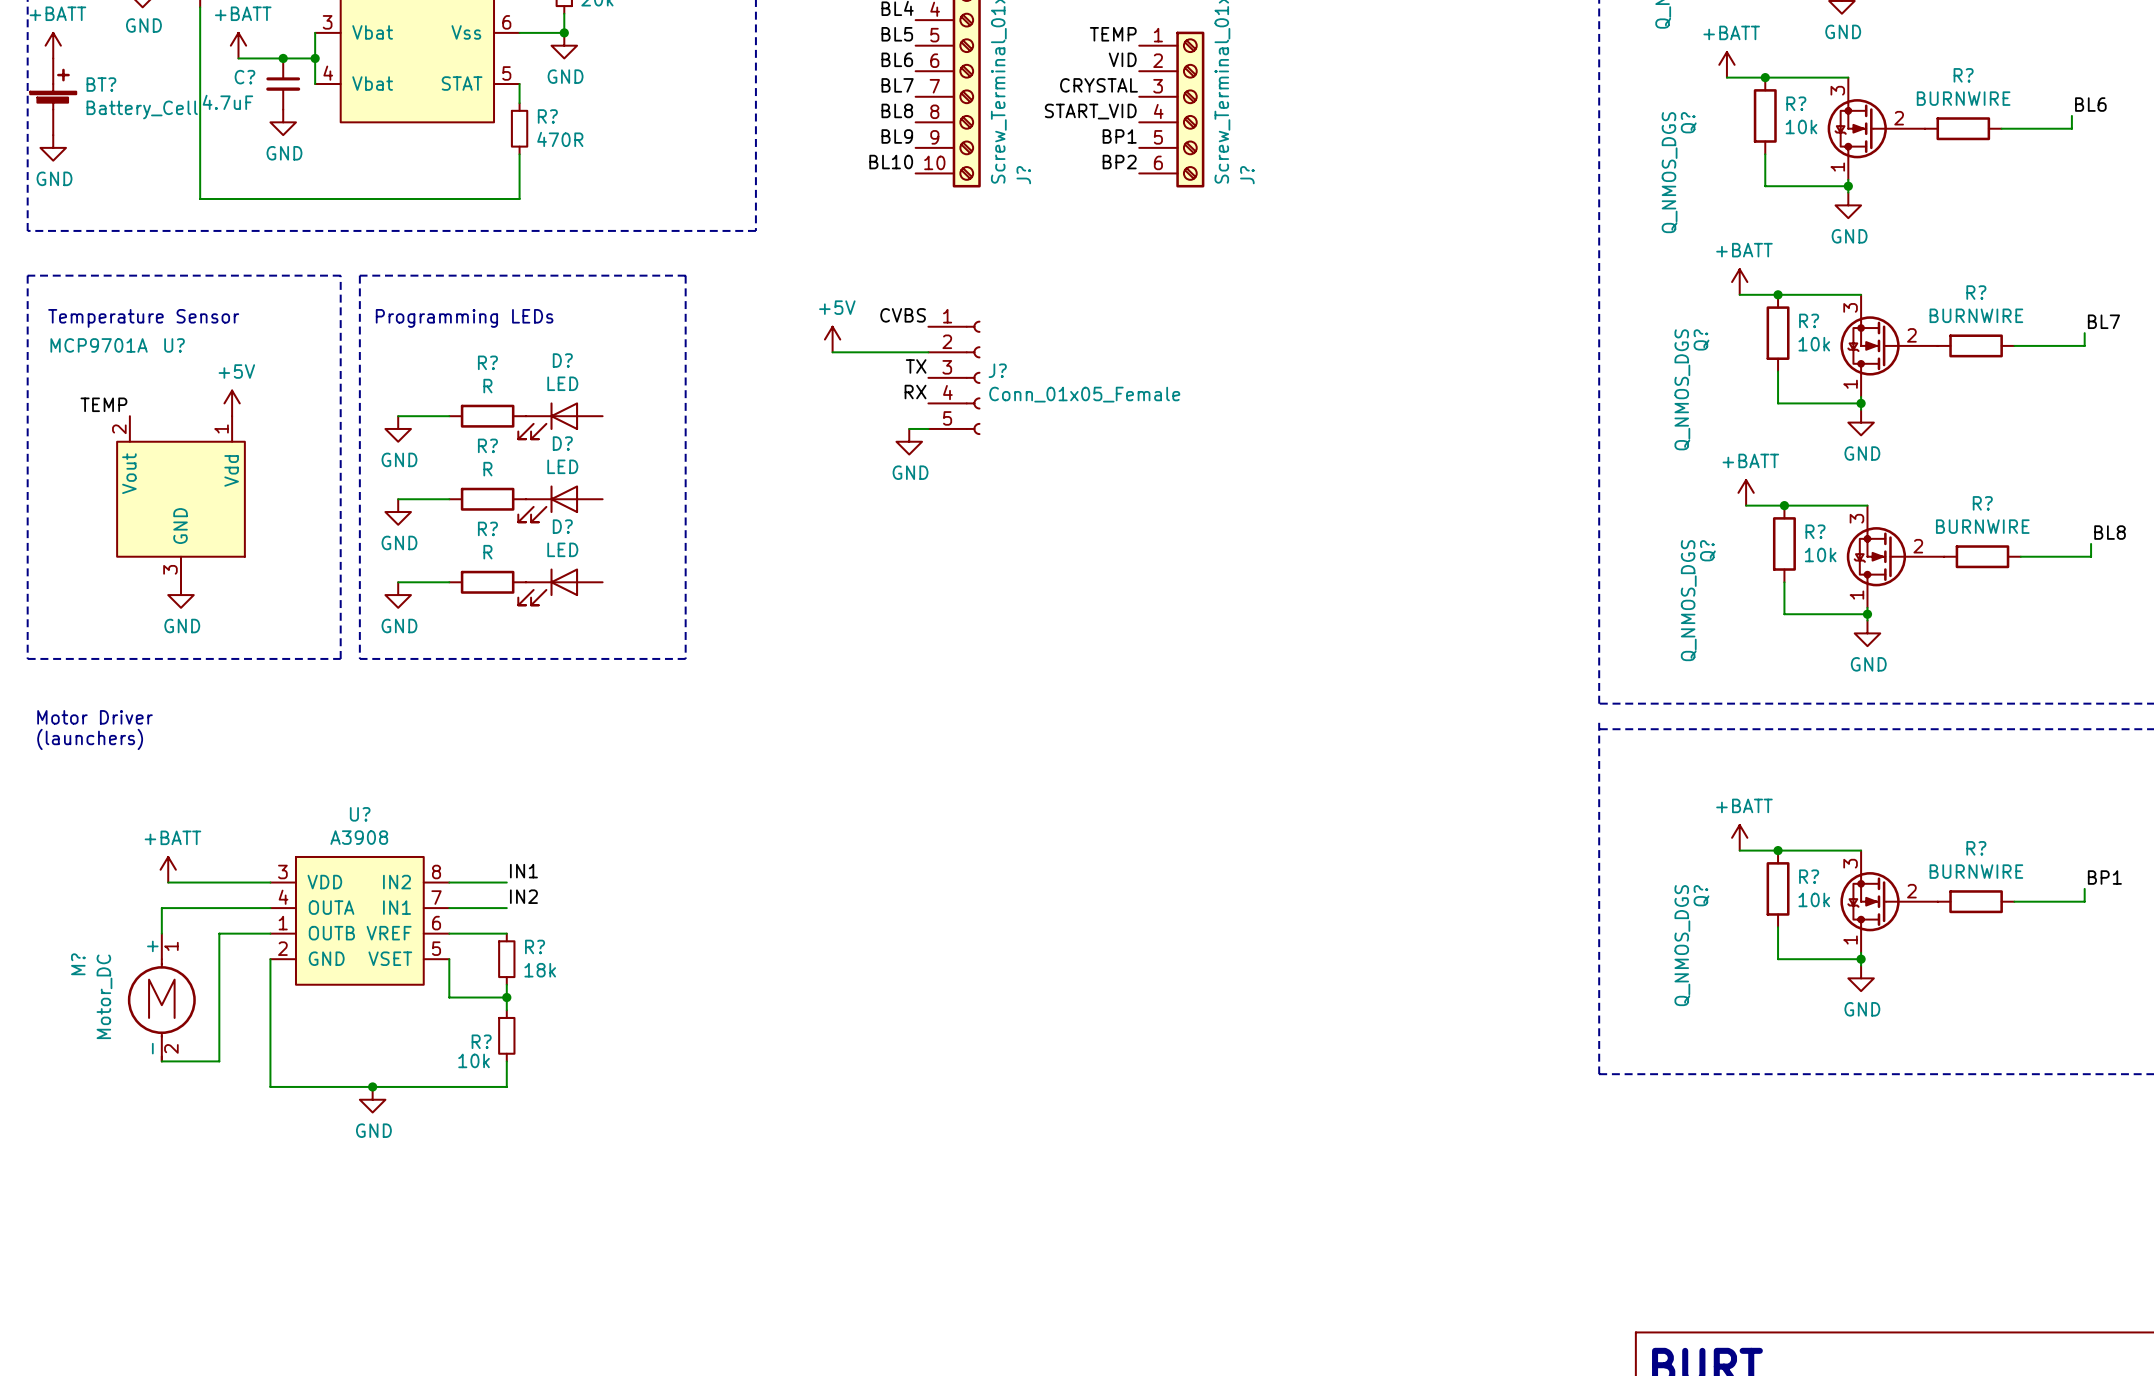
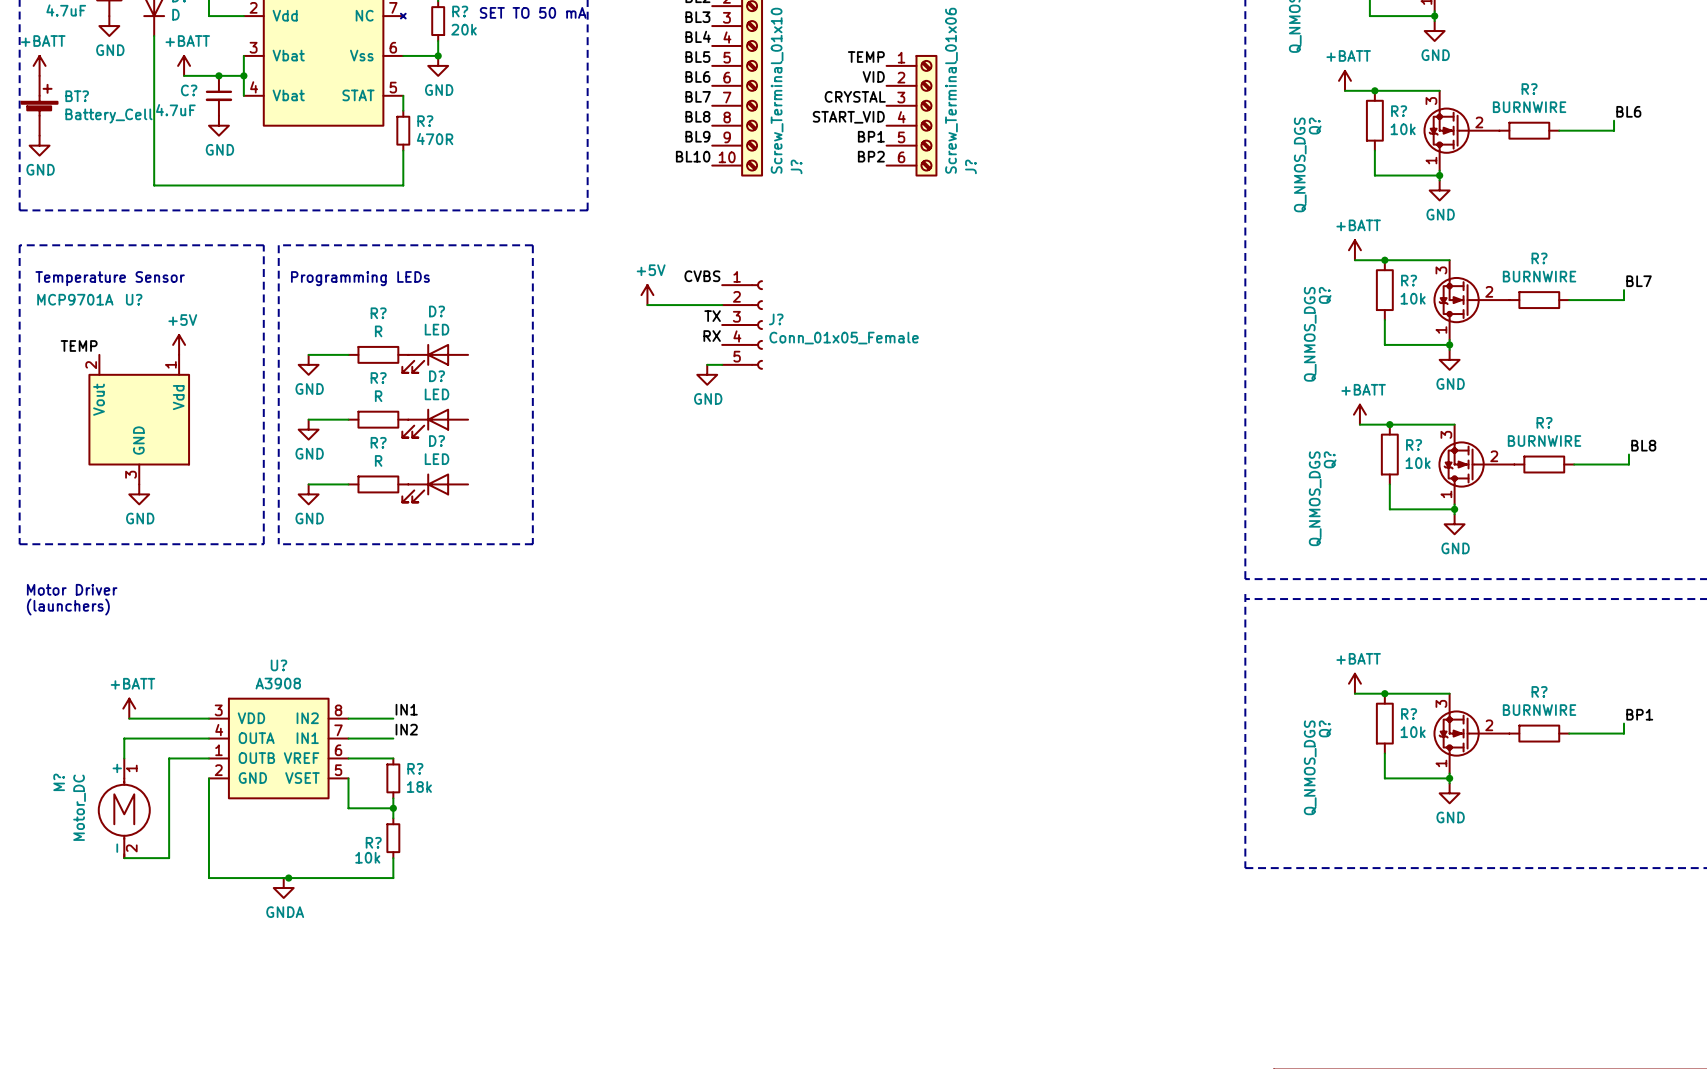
power symbol: GND (372, 1099) -> GNDA (283, 888)

